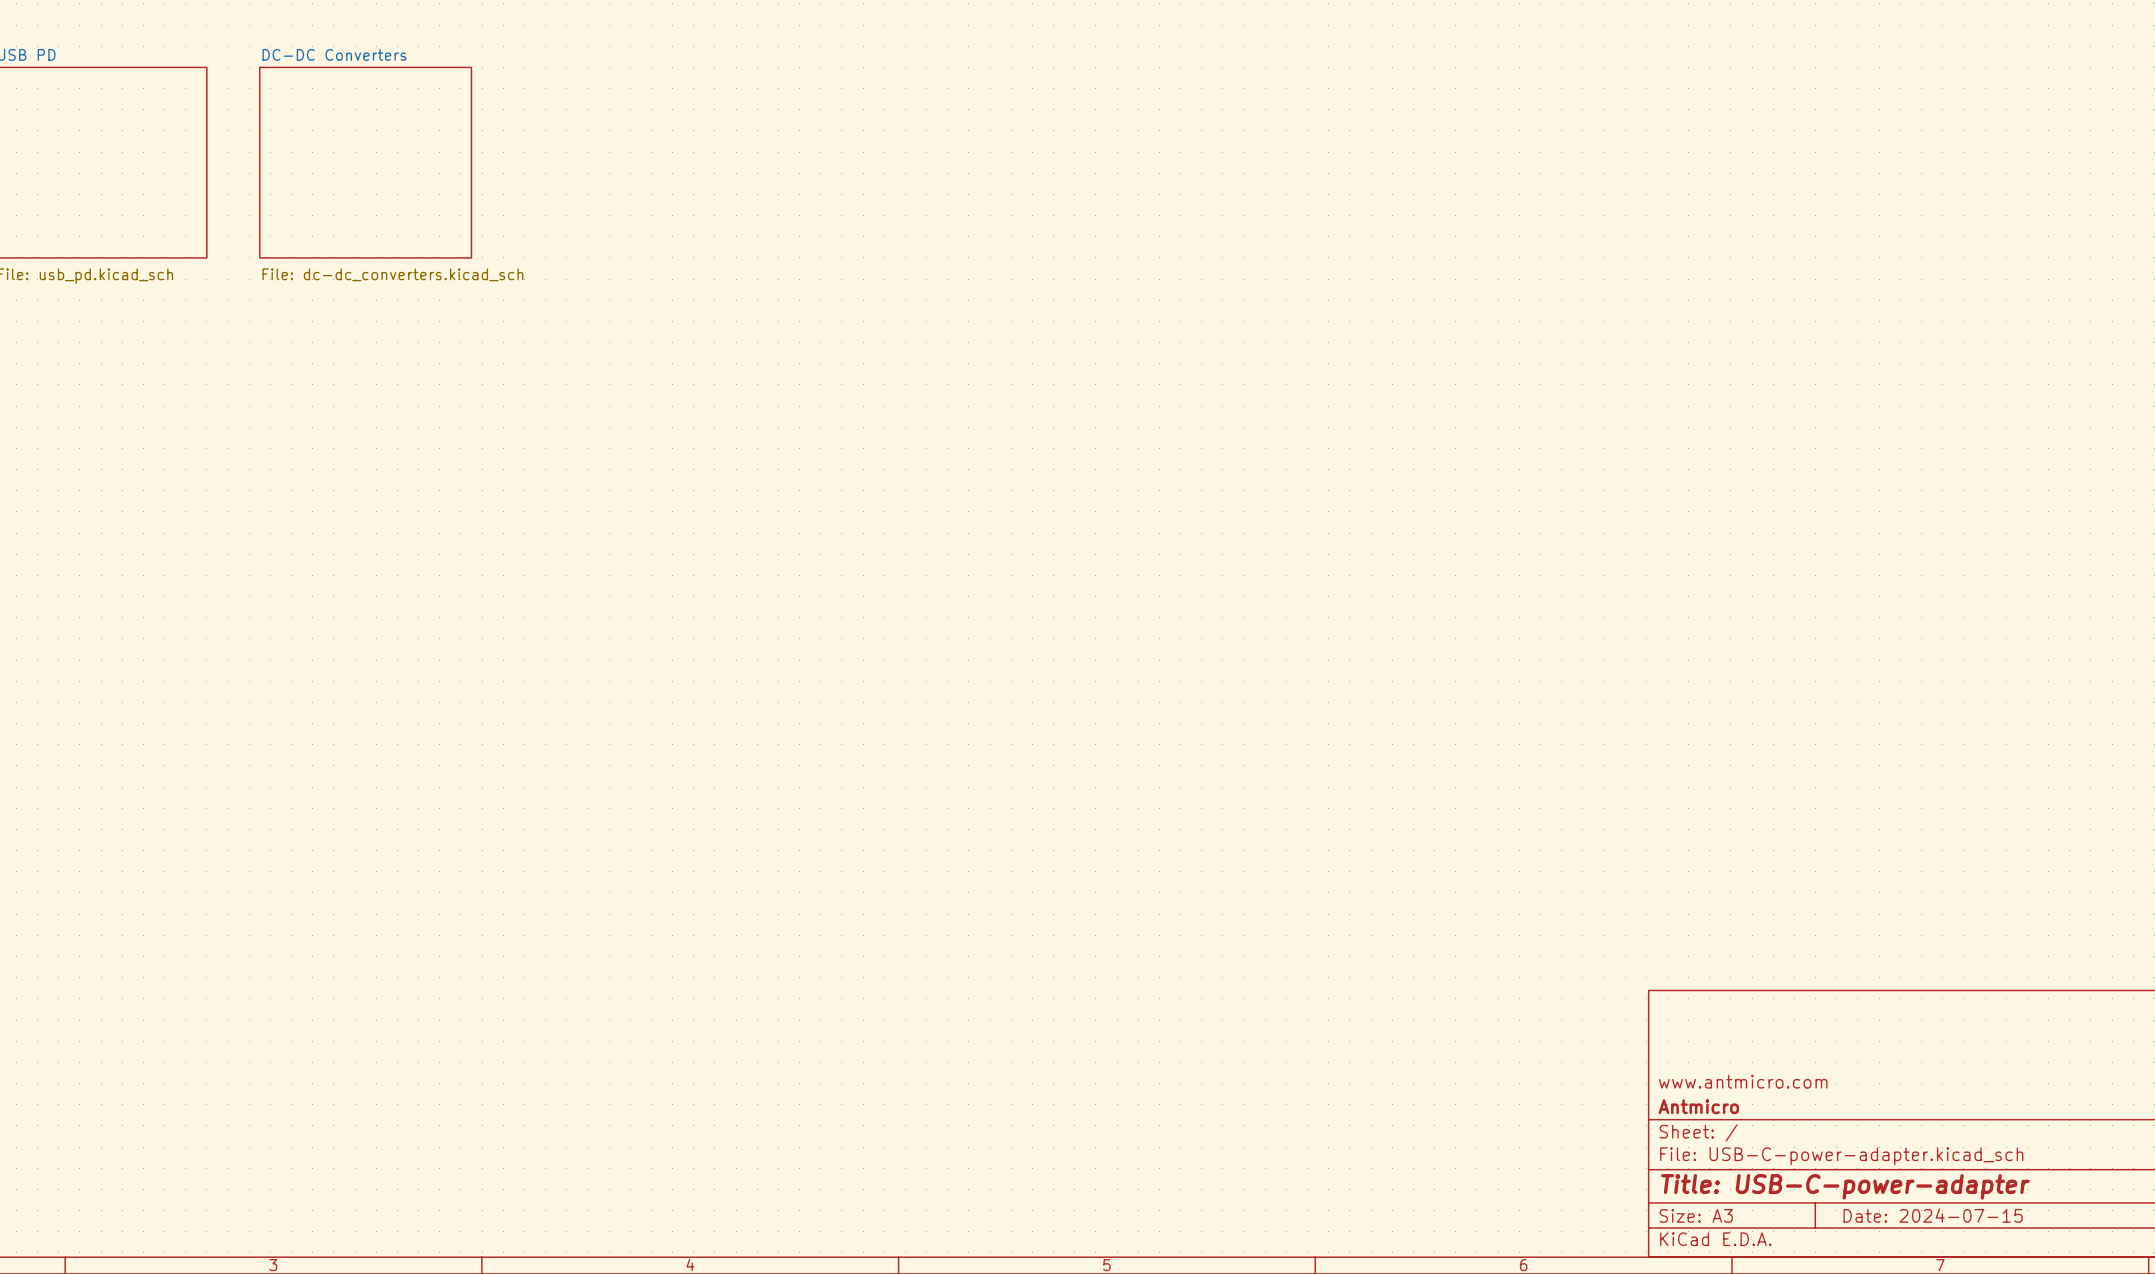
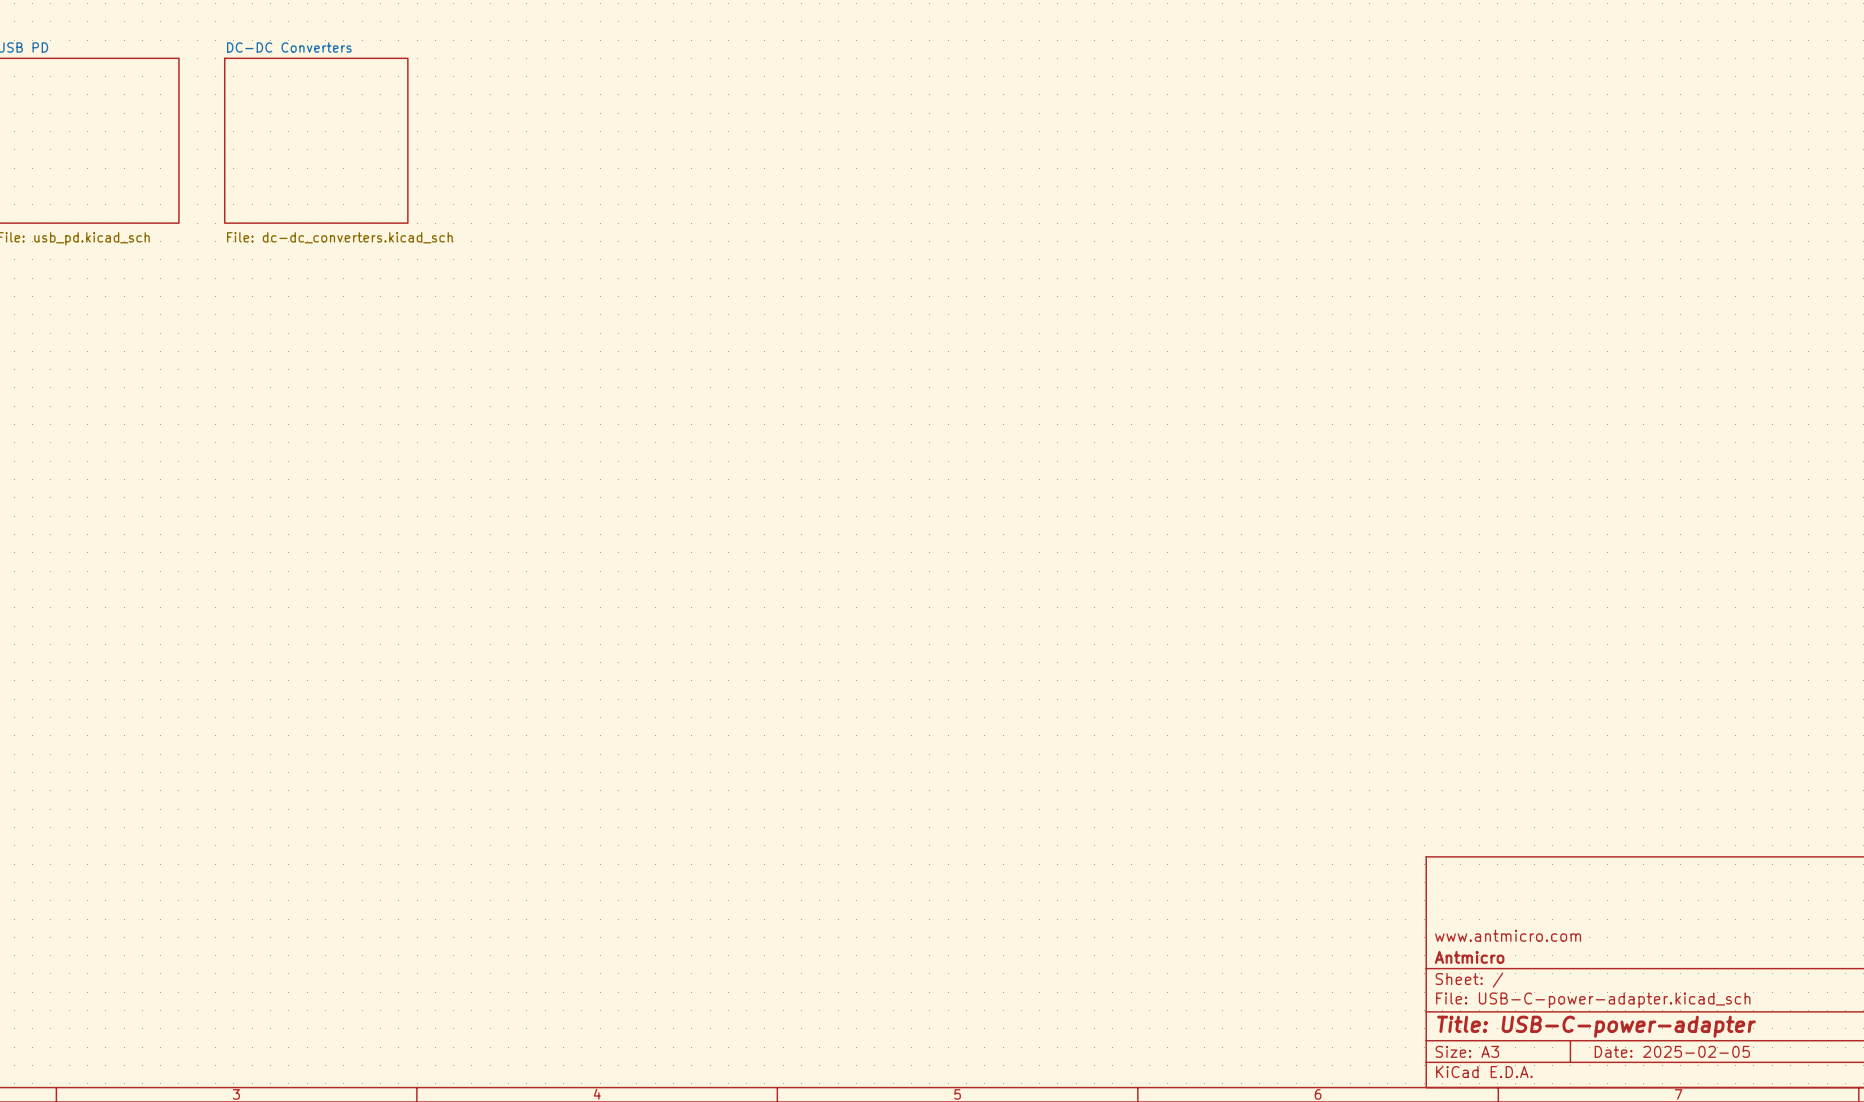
title block: Date: 2024-07-15 (1933, 1215) -> Date: 2025-02-05 (1672, 1051)

